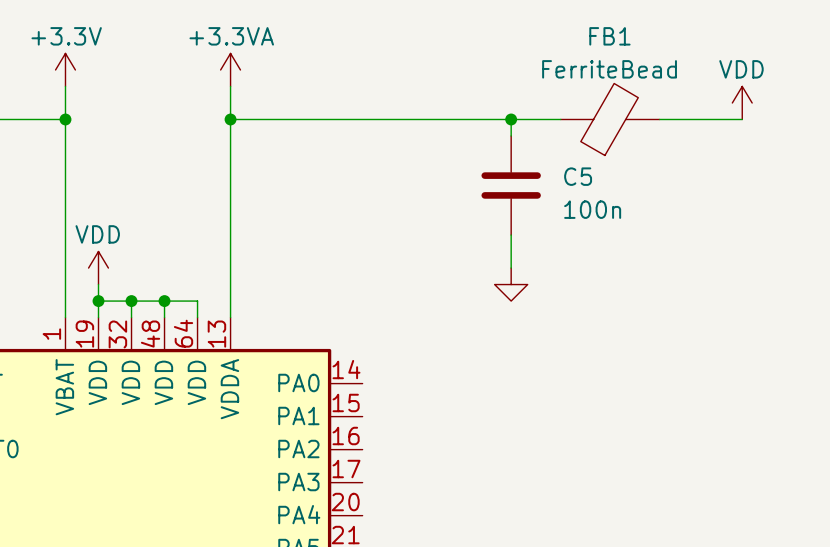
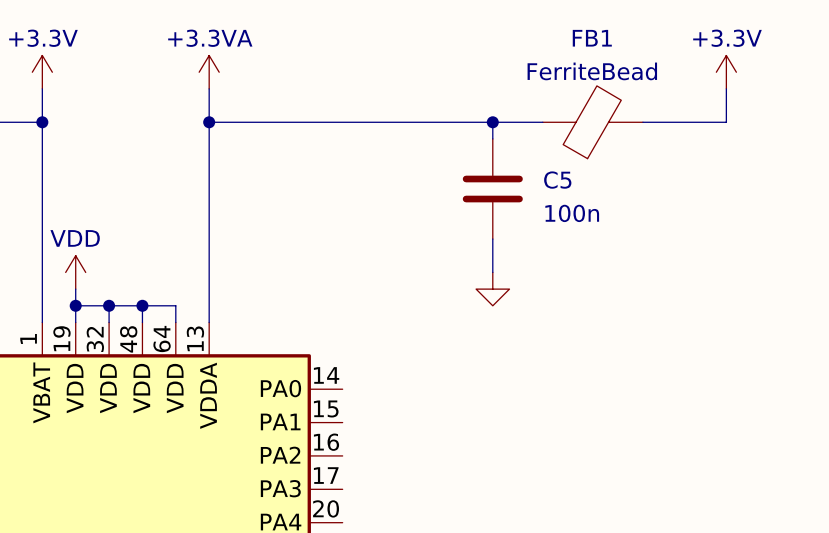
power symbol: none -> +3.3V (726, 72)
power symbol: VDD (742, 102) -> none

